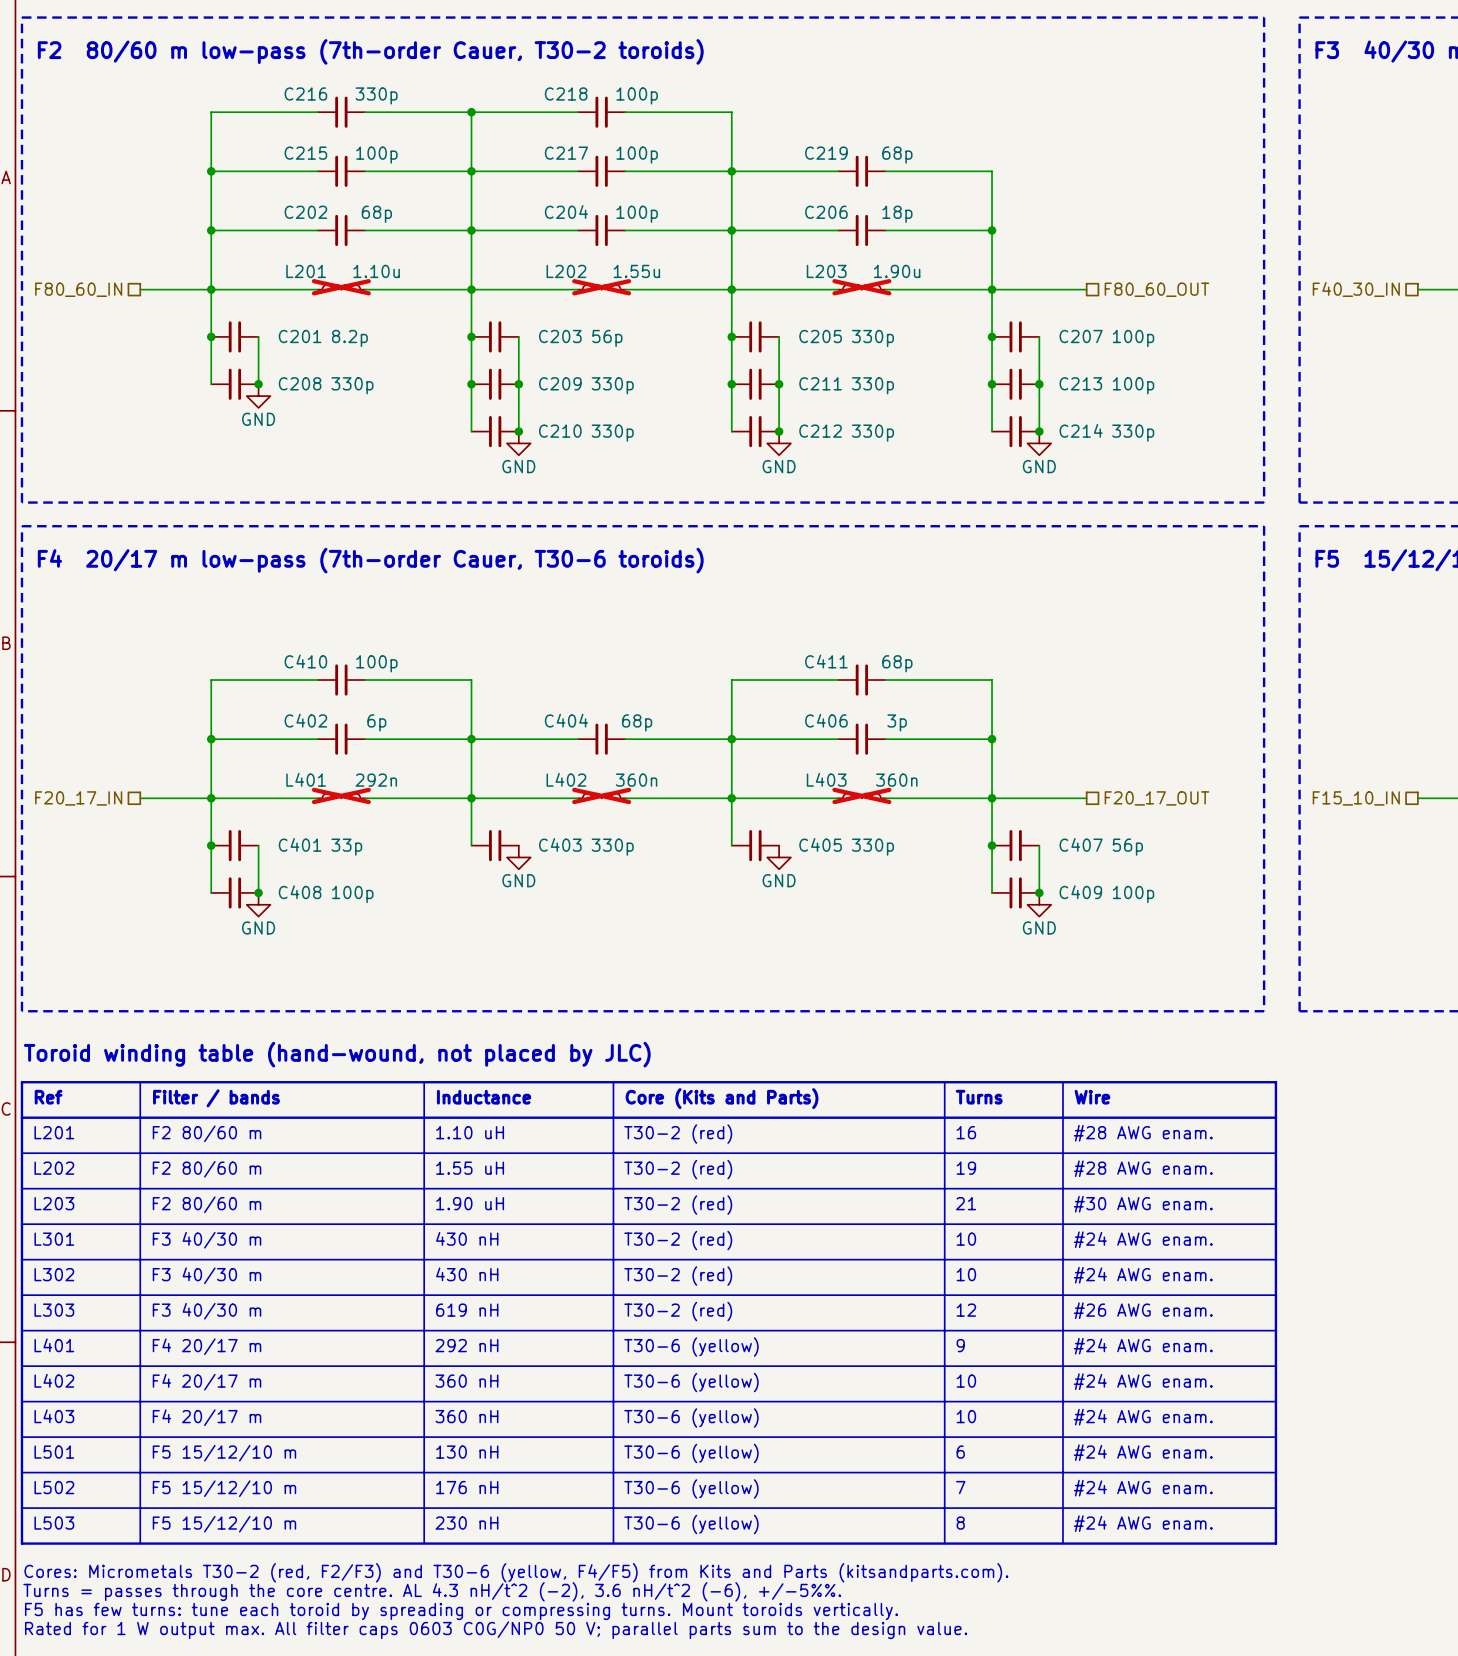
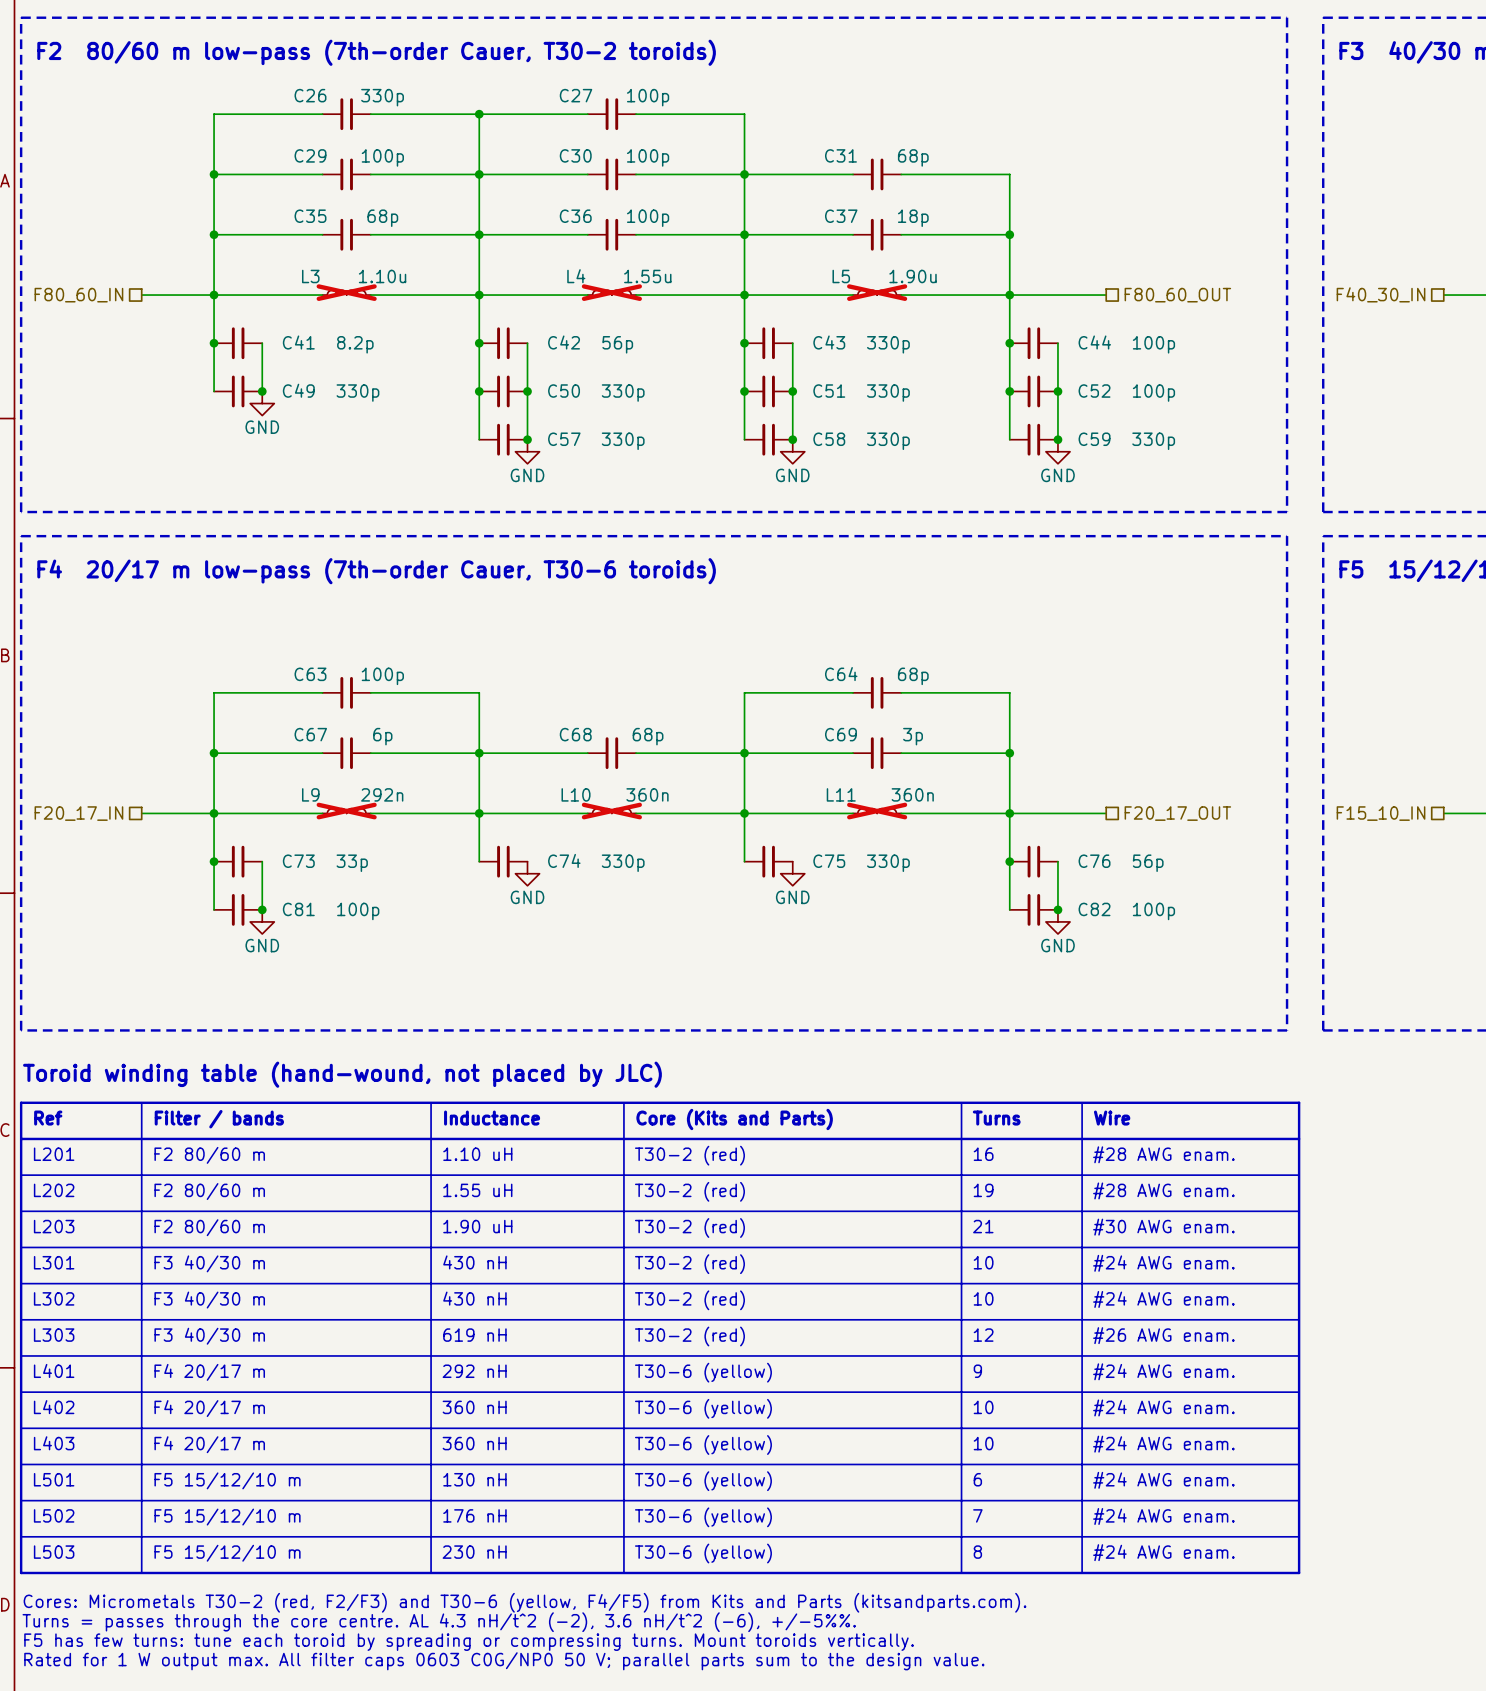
C216 name: C216 (305, 93) -> C26 (310, 95)
C218 name: C218 (566, 93) -> C27 (576, 95)
C215 name: C215 (305, 153) -> C29 (310, 155)
C217 name: C217 (566, 153) -> C30 (575, 155)
C219 name: C219 (826, 153) -> C31 (840, 155)
C202 name: C202 (305, 212) -> C35 (310, 216)
C204 name: C204 (566, 212) -> C36 (575, 216)
C206 name: C206 (826, 212) -> C37 (841, 216)
L201 name: L201 (306, 271) -> L3 (310, 276)
L202 name: L202 (566, 271) -> L4 (576, 276)
L203 name: L203 (826, 271) -> L5 (841, 276)
C201 name: C201 (300, 336) -> C41 (298, 342)
C203 name: C203 (560, 336) -> C42 (564, 342)
C205 name: C205 (820, 336) -> C43 (829, 342)
C207 name: C207 (1081, 336) -> C44 (1094, 342)
C208 name: C208 (300, 383) -> C49 (298, 390)
C209 name: C209 (560, 383) -> C50 (564, 391)
C211 name: C211 (820, 383) -> C51 (829, 391)
C213 name: C213 (1080, 383) -> C52 (1094, 391)
C214 name: C214 (1081, 430) -> C59 (1094, 439)
C210 name: C210 (560, 431) -> C57 (564, 439)
C212 name: C212 (820, 431) -> C58 (829, 439)
C410 name: C410 (305, 661) -> C63 (310, 674)
C411 name: C411 (826, 661) -> C64 (841, 674)
C402 name: C402 (305, 720) -> C67 (310, 734)
C404 name: C404 (566, 720) -> C68 (575, 734)
C406 name: C406 (826, 720) -> C69 (840, 734)
L401 name: L401 (306, 779) -> L9 (310, 794)
L402 name: L402 (566, 779) -> L10 (576, 794)
L403 name: L403 (826, 779) -> L11 (841, 794)
C401 name: C401 (300, 844) -> C73 (298, 861)
C403 name: C403 (560, 844) -> C74 (564, 860)
C405 name: C405 (820, 844) -> C75 (829, 861)
C407 name: C407 (1081, 844) -> C76 (1094, 861)
C408 name: C408 (300, 892) -> C81 (298, 909)
C409 name: C409 (1080, 892) -> C82 (1094, 909)

